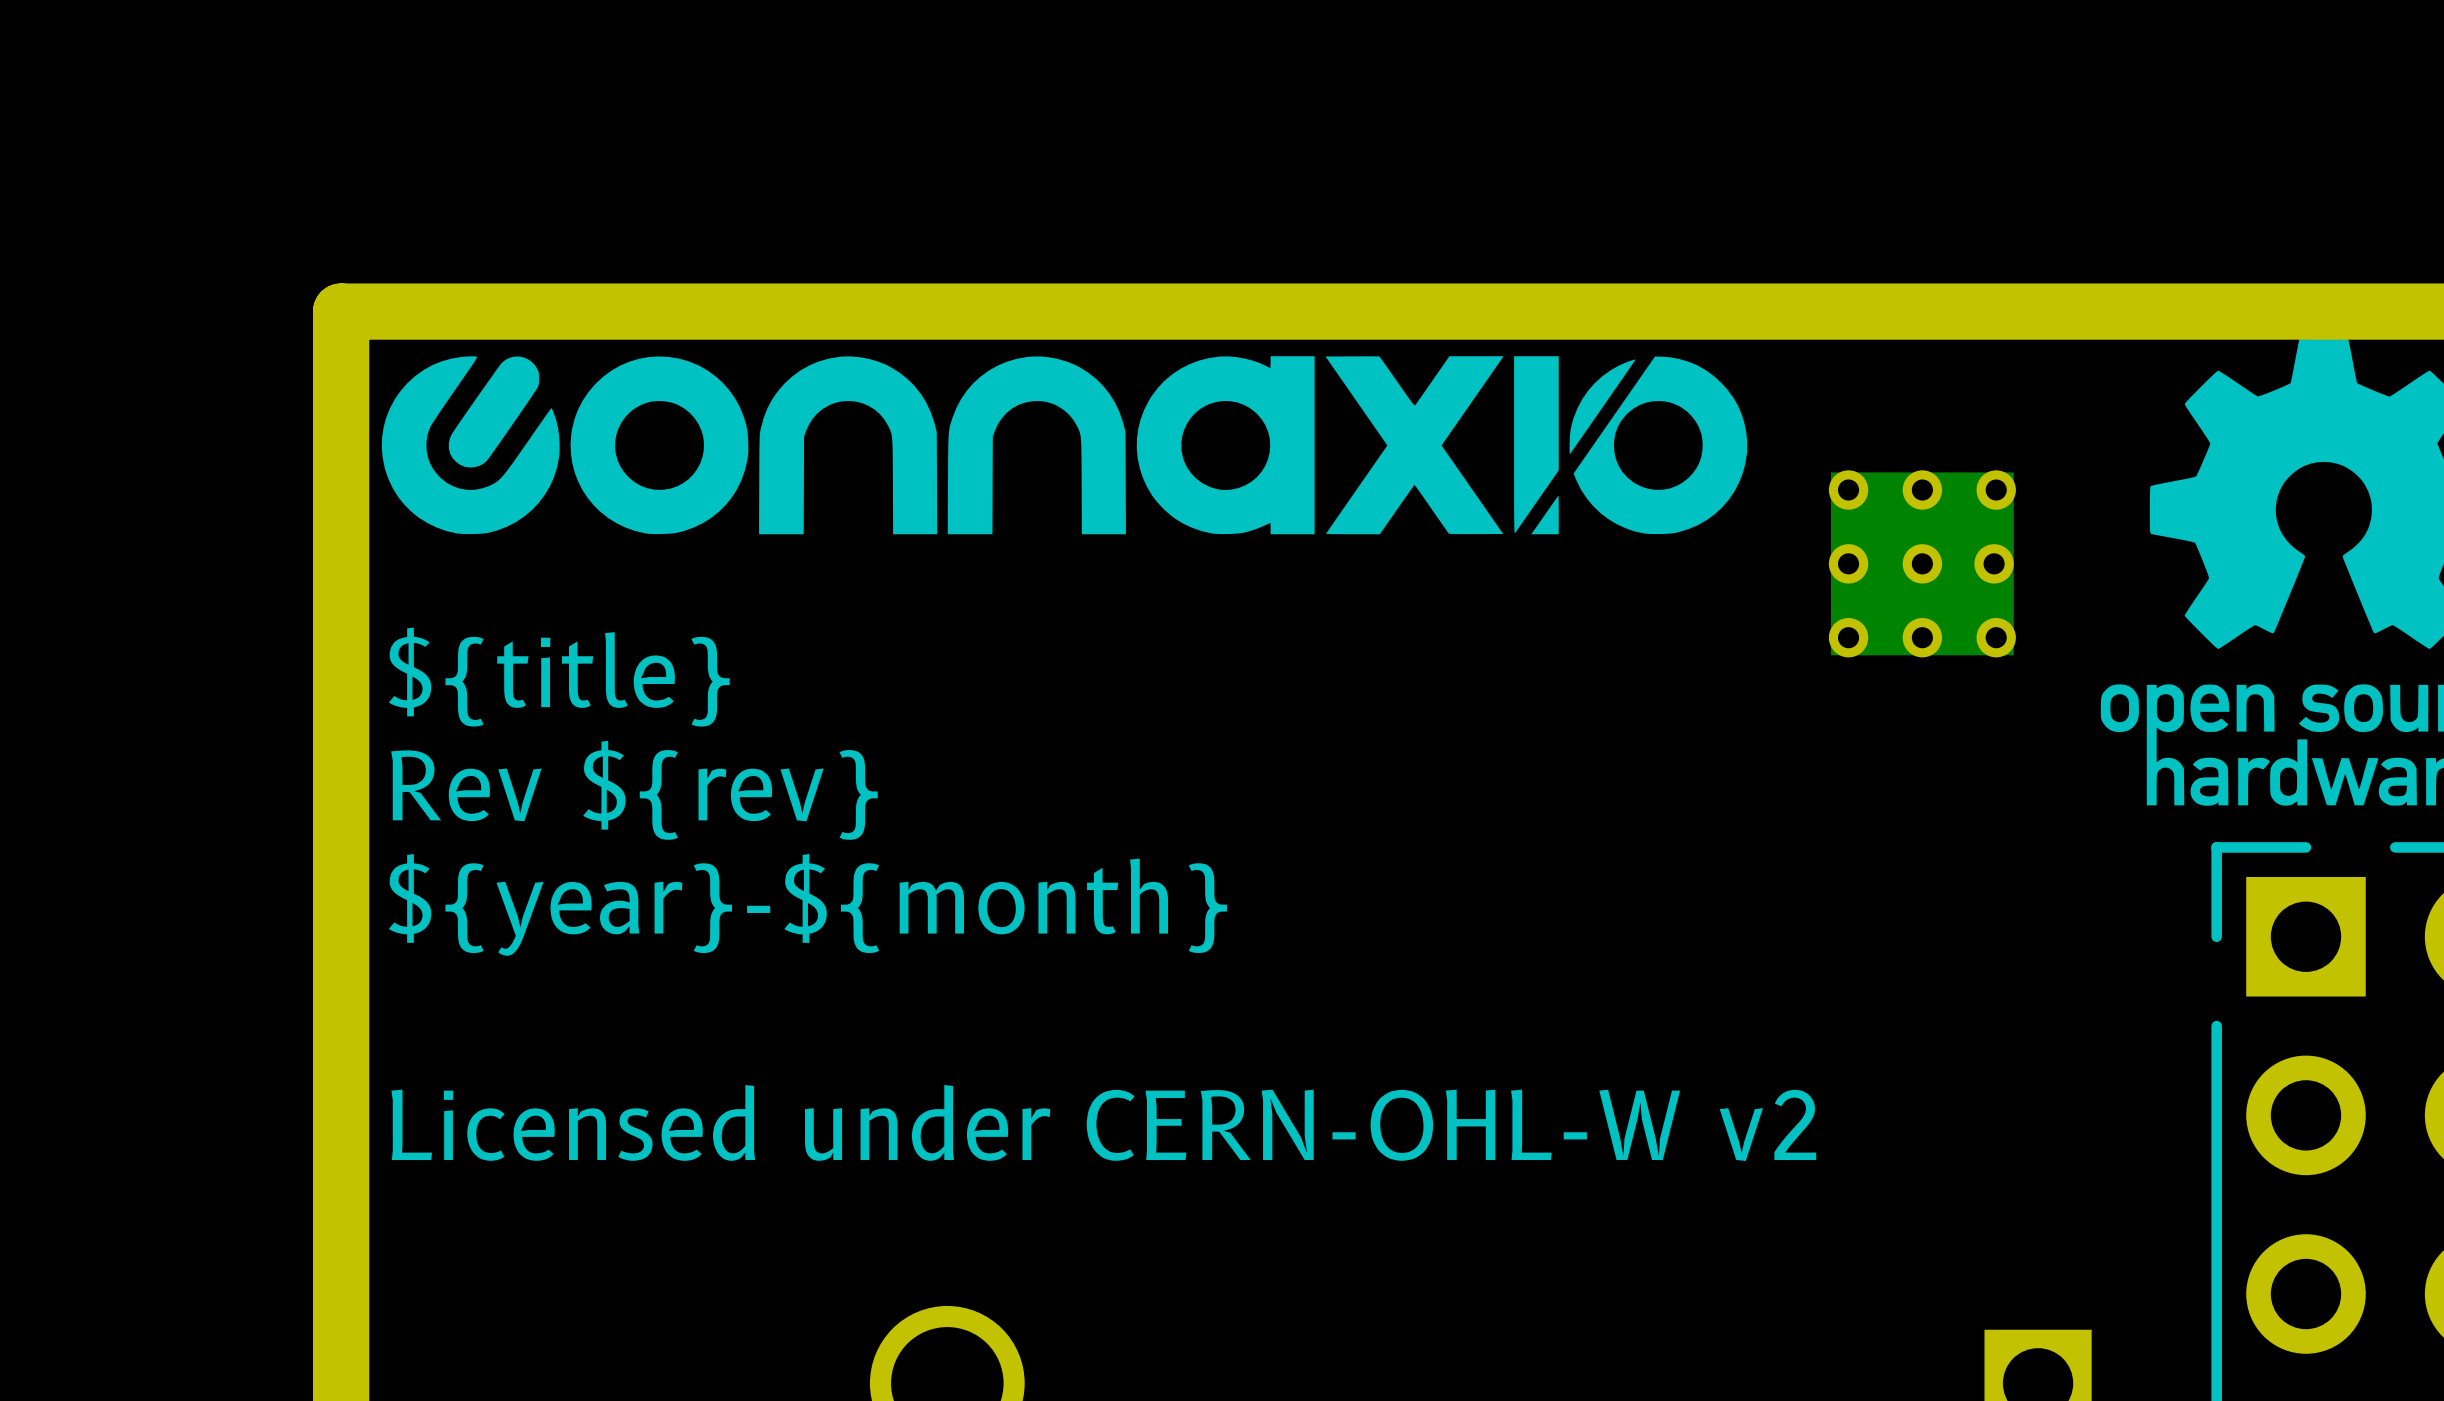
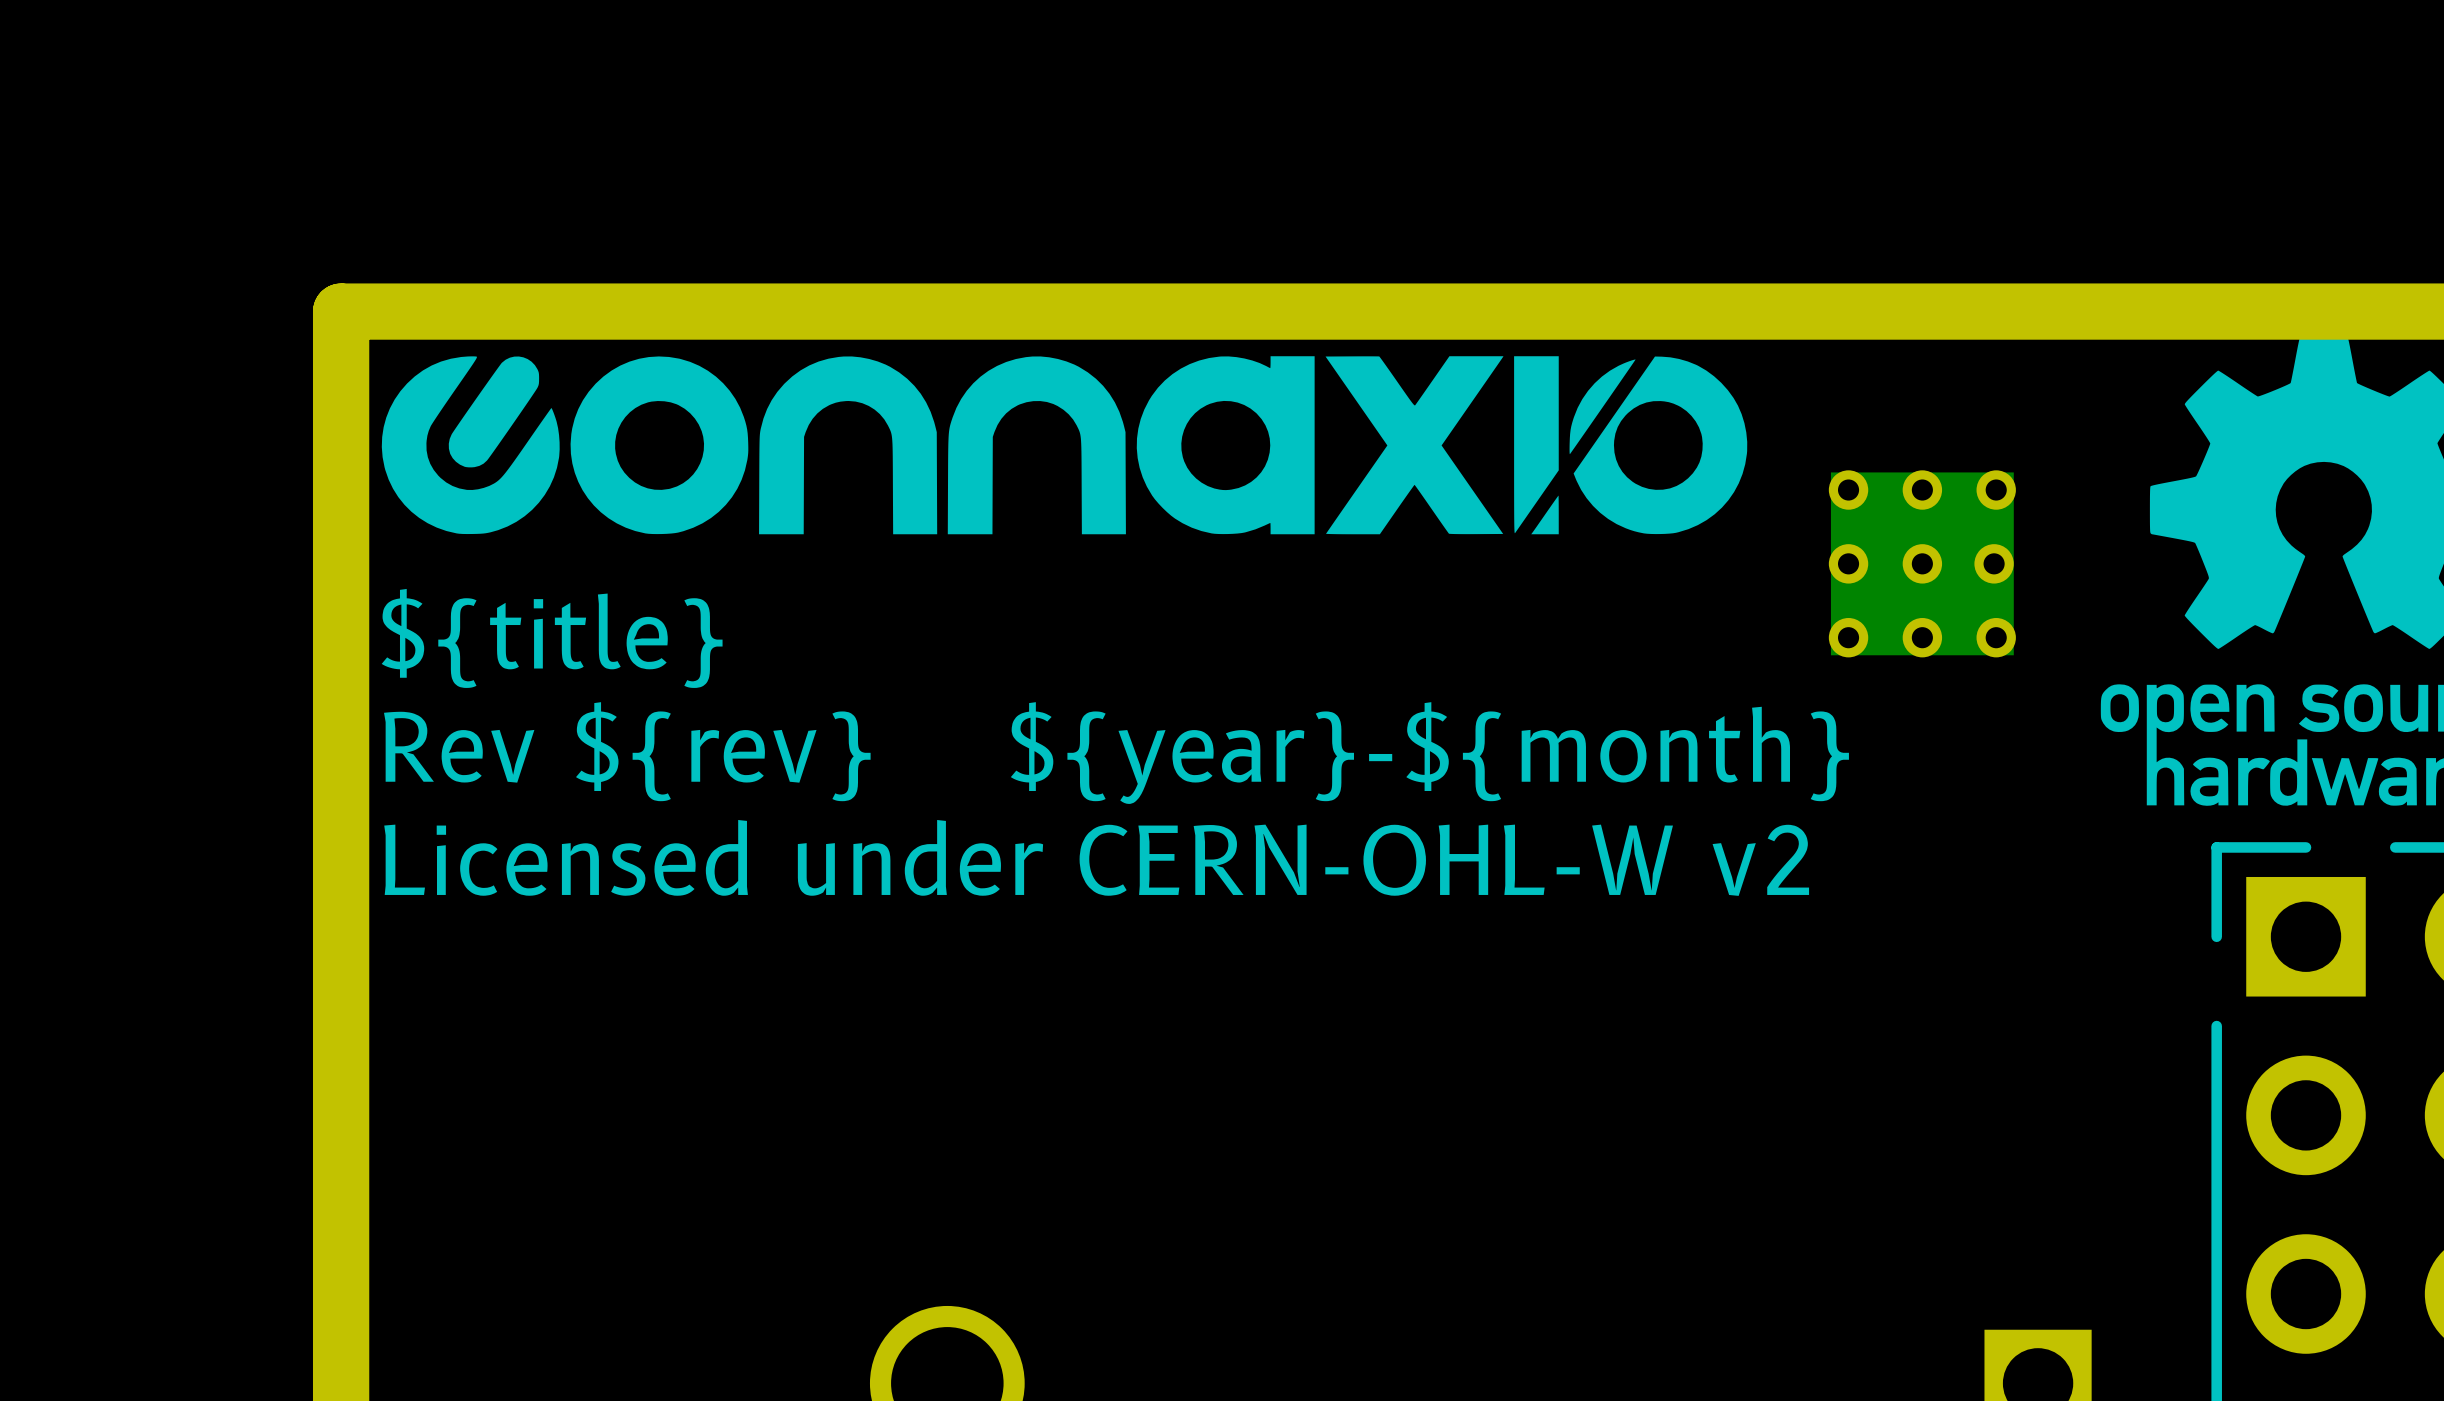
text position: ${title} (559, 677) -> ${title} (552, 638)
text: Rev ${rev} (634, 790) -> Rev ${rev} ${year}-${month} (1116, 753)
text: ${year}-${month} (807, 904) -> none
text position: Licensed under CERN-OHL-W v2 (1103, 1123) -> Licensed under CERN-OHL-W v2 (1096, 857)

